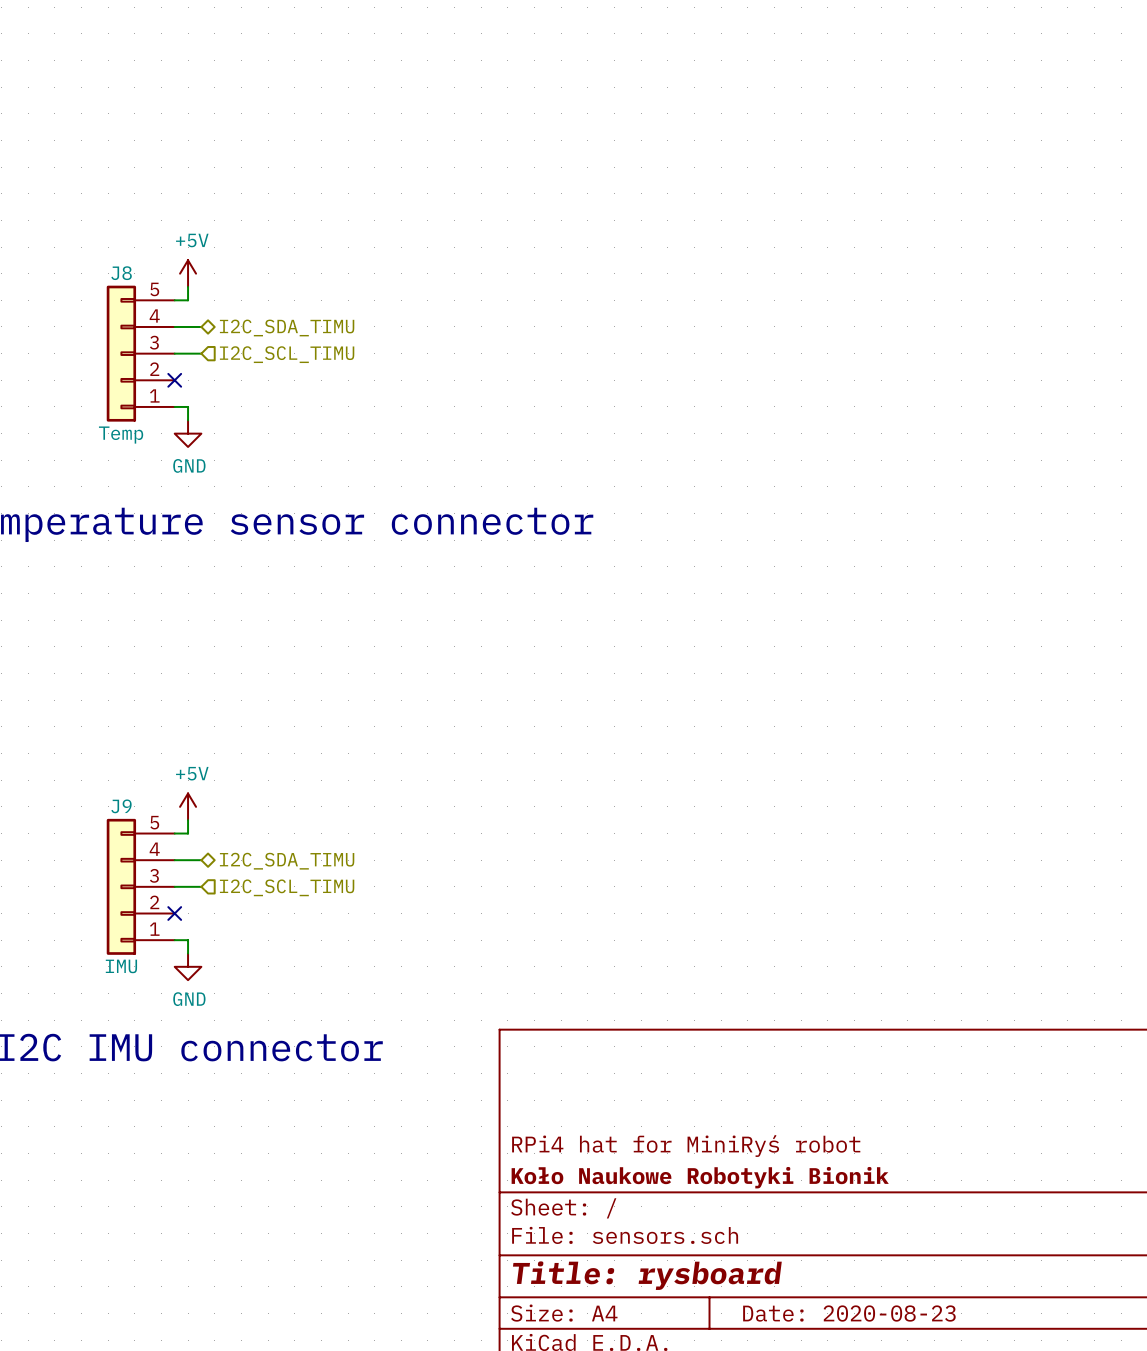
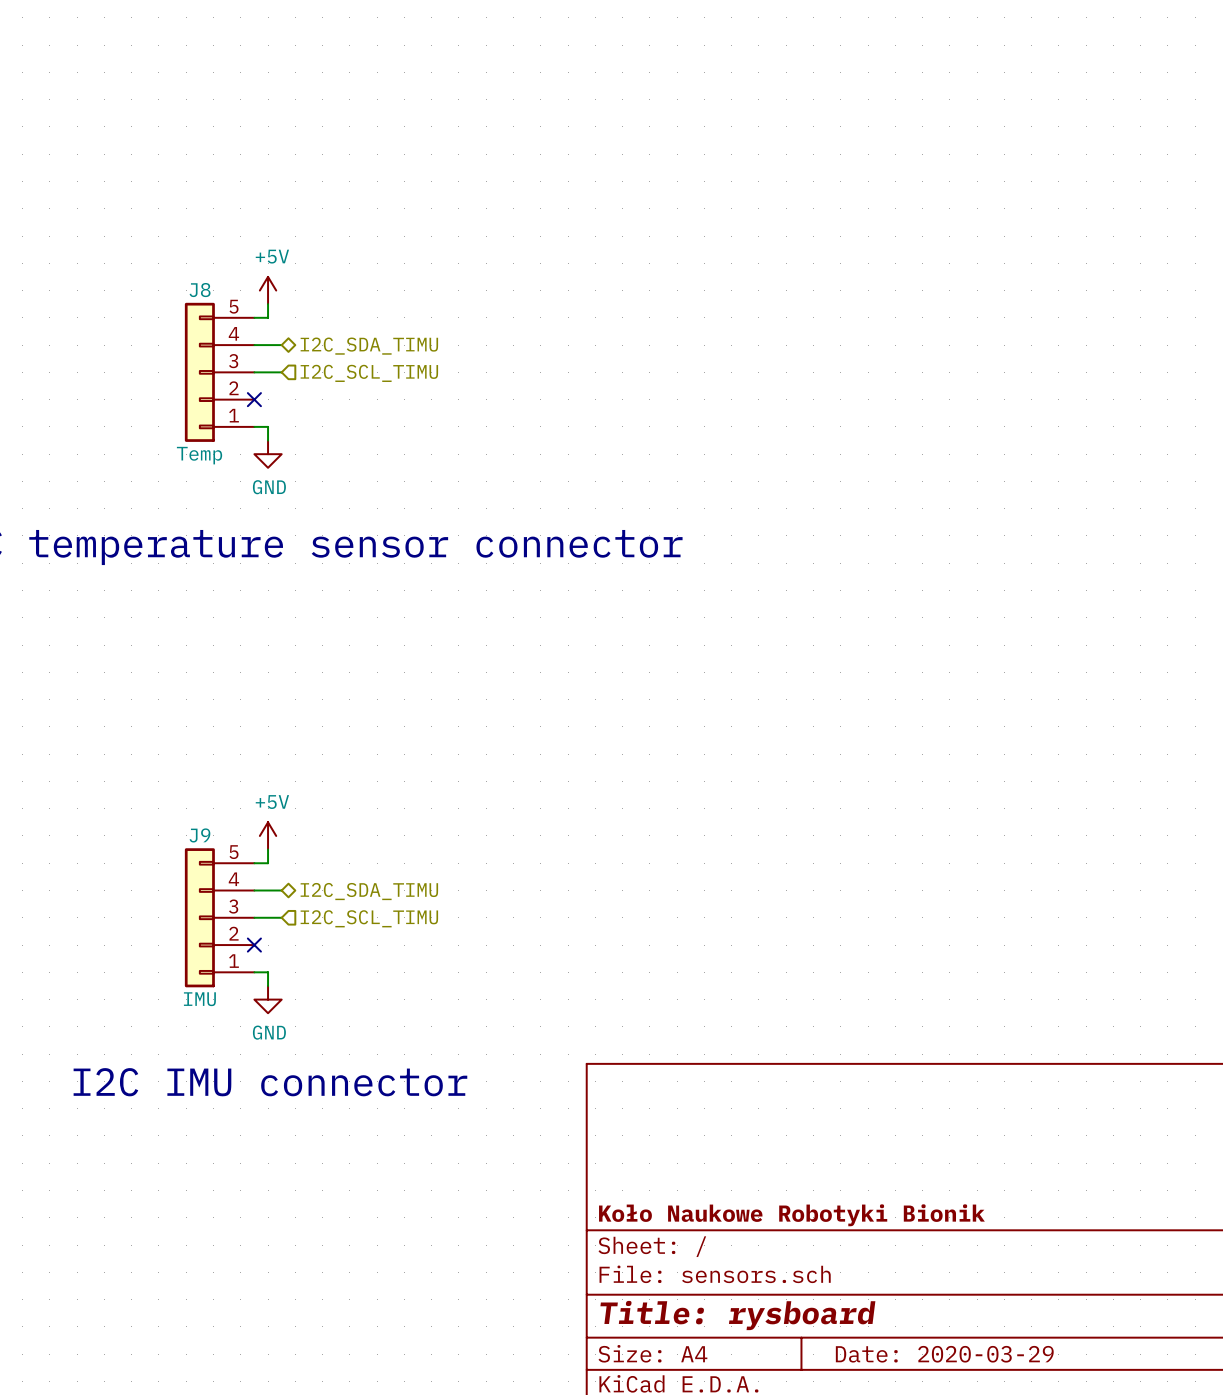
title block: RPi4 hat for MiniRyś robot (686, 1145) -> none
title block: Date: 2020-08-23 (849, 1313) -> Date: 2020-03-29 (944, 1354)

